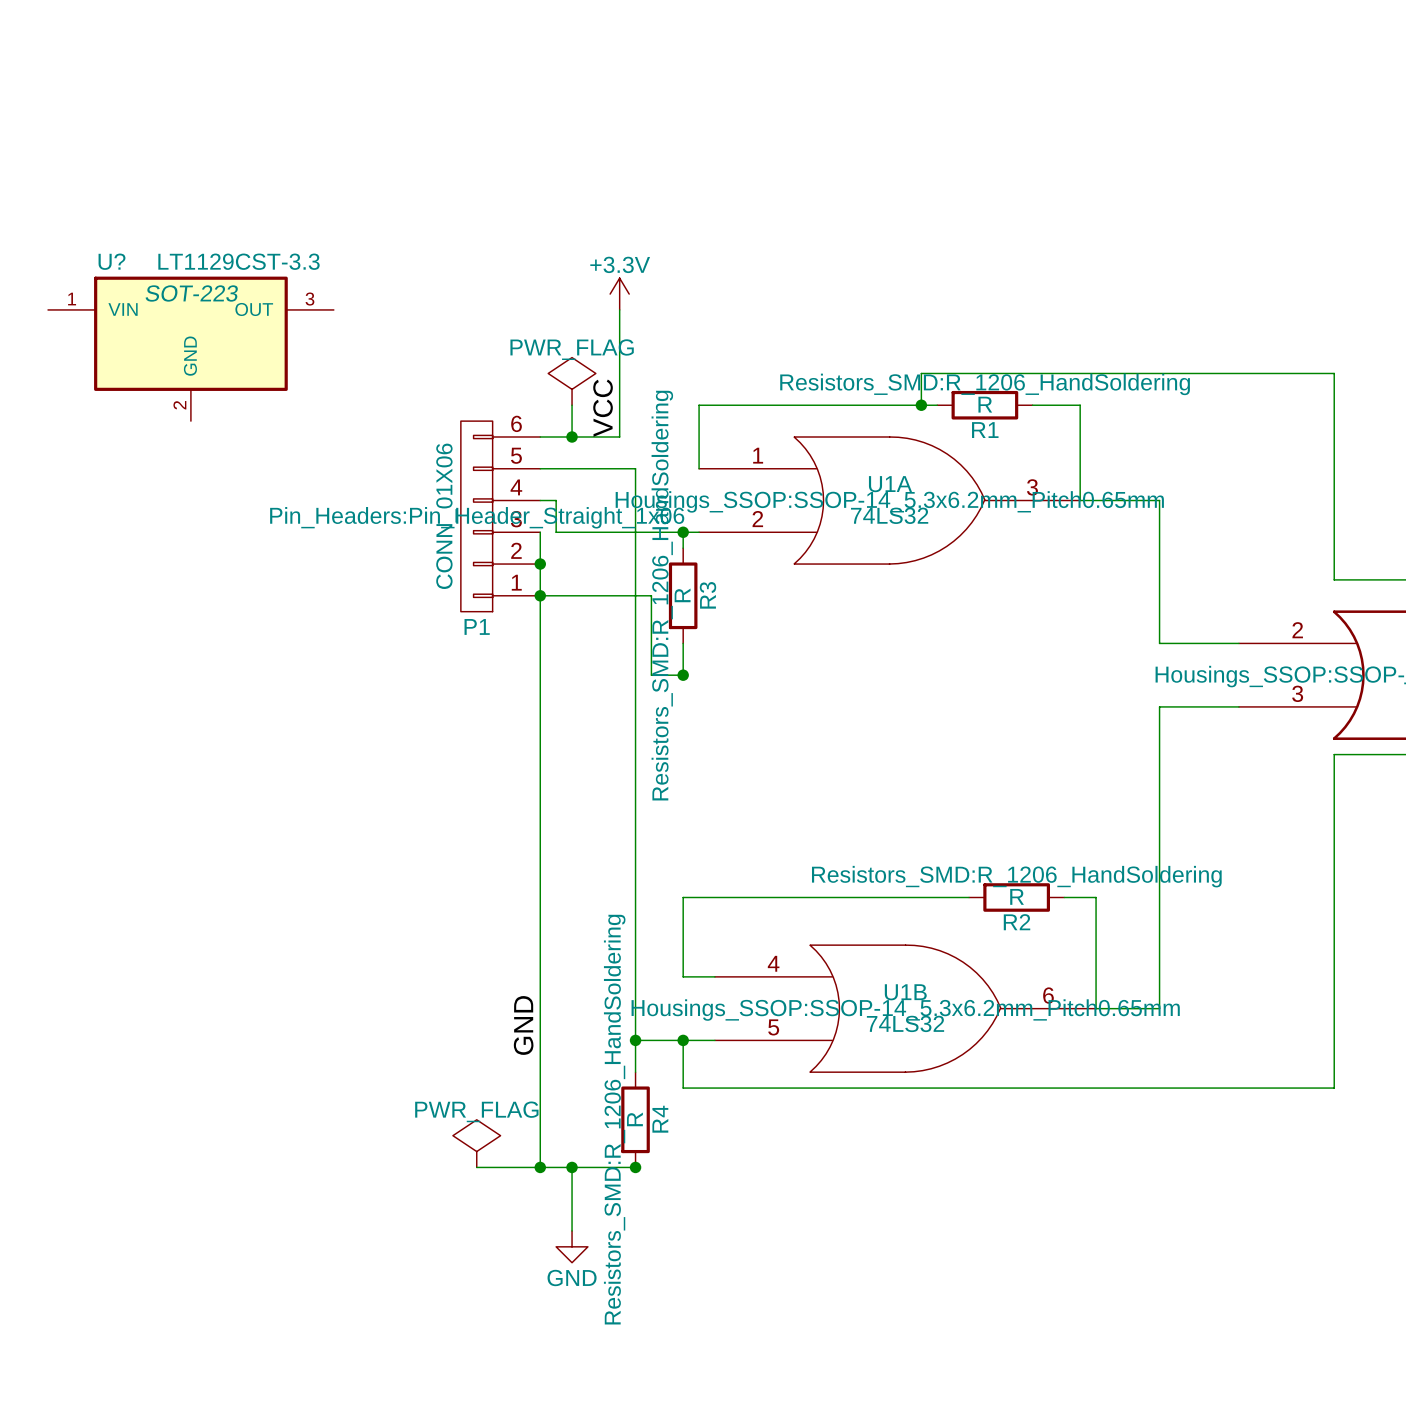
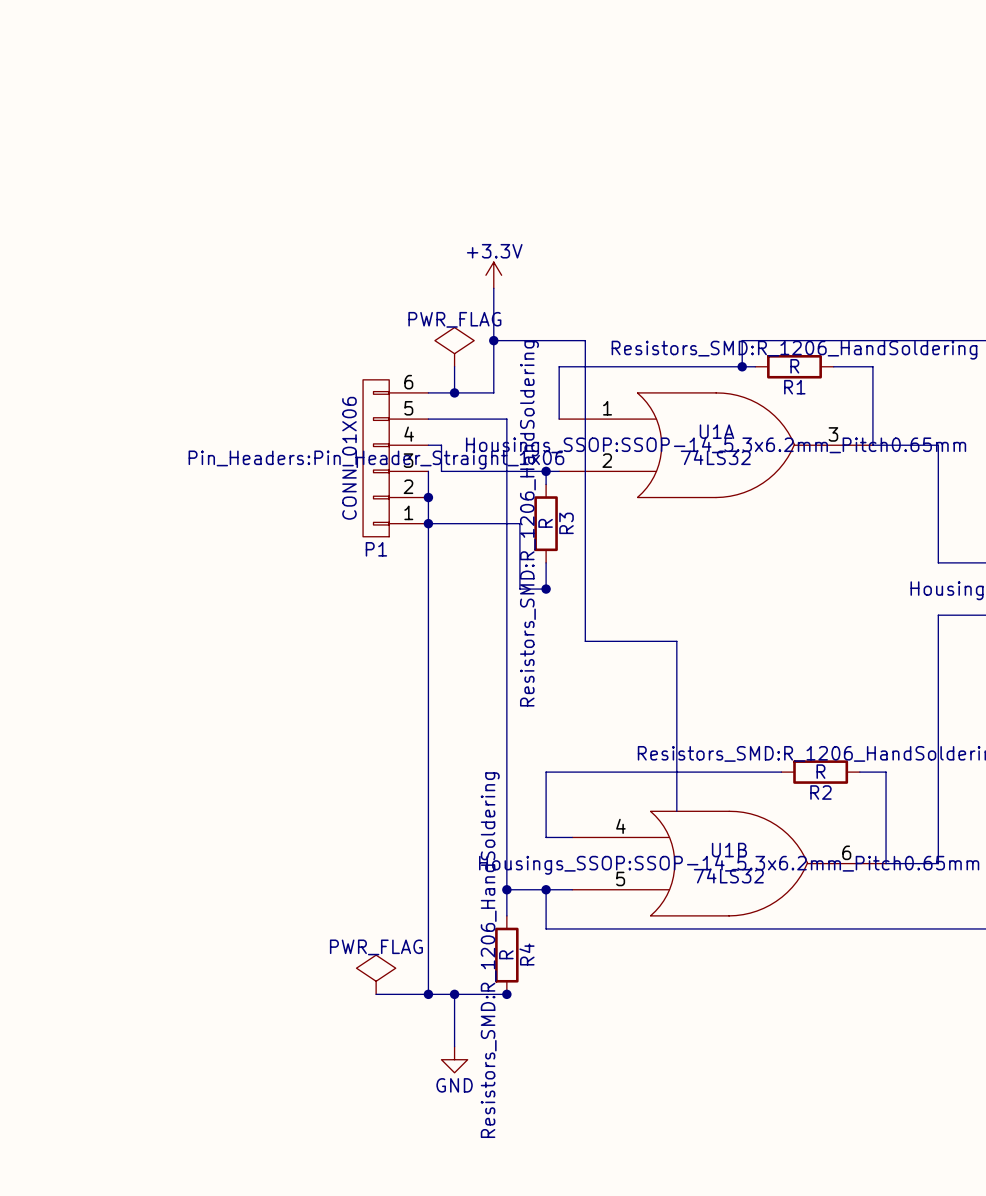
U?: LT1129CST-3.3 (190, 348) -> none
wire: none -> (493, 340) (585, 340) (585, 641) (676, 641) (676, 811)
junction: none -> (493, 340)
label: VCC (603, 408) -> none
label: GND (523, 1025) -> none

